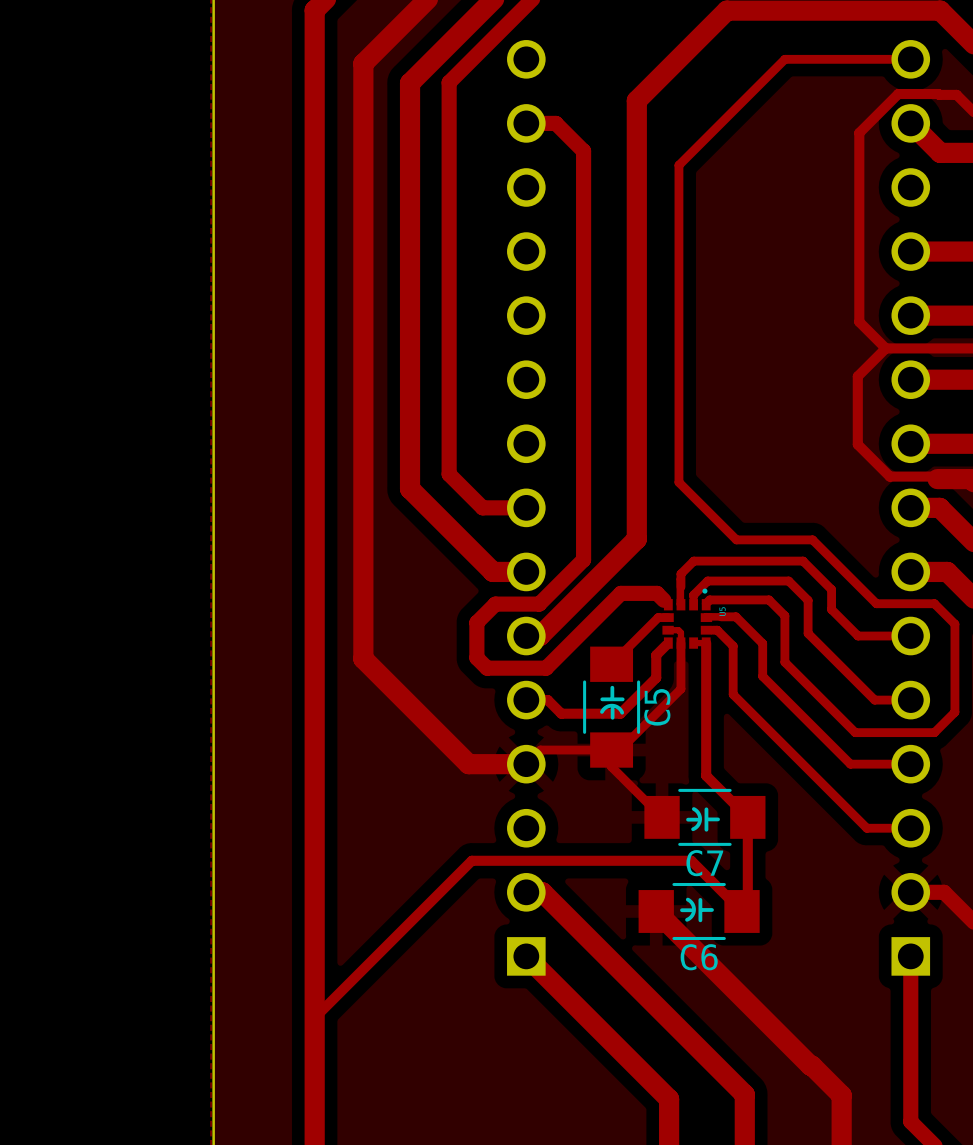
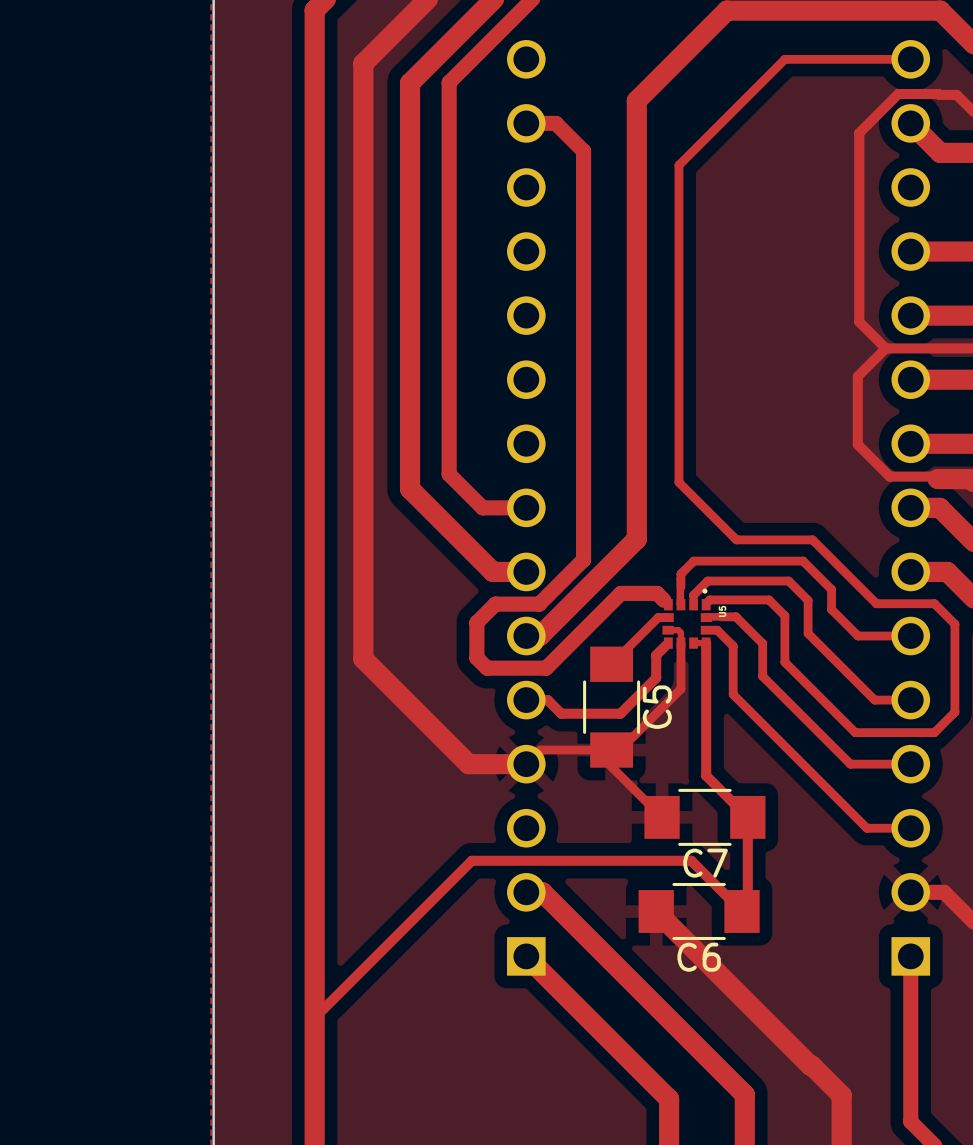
line: (612, 687) (612, 696) -> none
line: (602, 699) (622, 699) -> none
line: (612, 708) (612, 717) -> none
line: (601, 711) (605, 707) (612, 705) (617, 707) (622, 712) -> none
line: (693, 809) (698, 813) (700, 819) (698, 824) (693, 829) -> none
line: (706, 809) (706, 829) -> none
line: (688, 819) (697, 819) -> none
line: (708, 819) (718, 819) -> none
line: (687, 899) (692, 903) (694, 909) (691, 916) (687, 919) -> none
line: (700, 899) (700, 920) -> none
line: (702, 909) (711, 909) -> none
line: (681, 910) (691, 910) -> none

